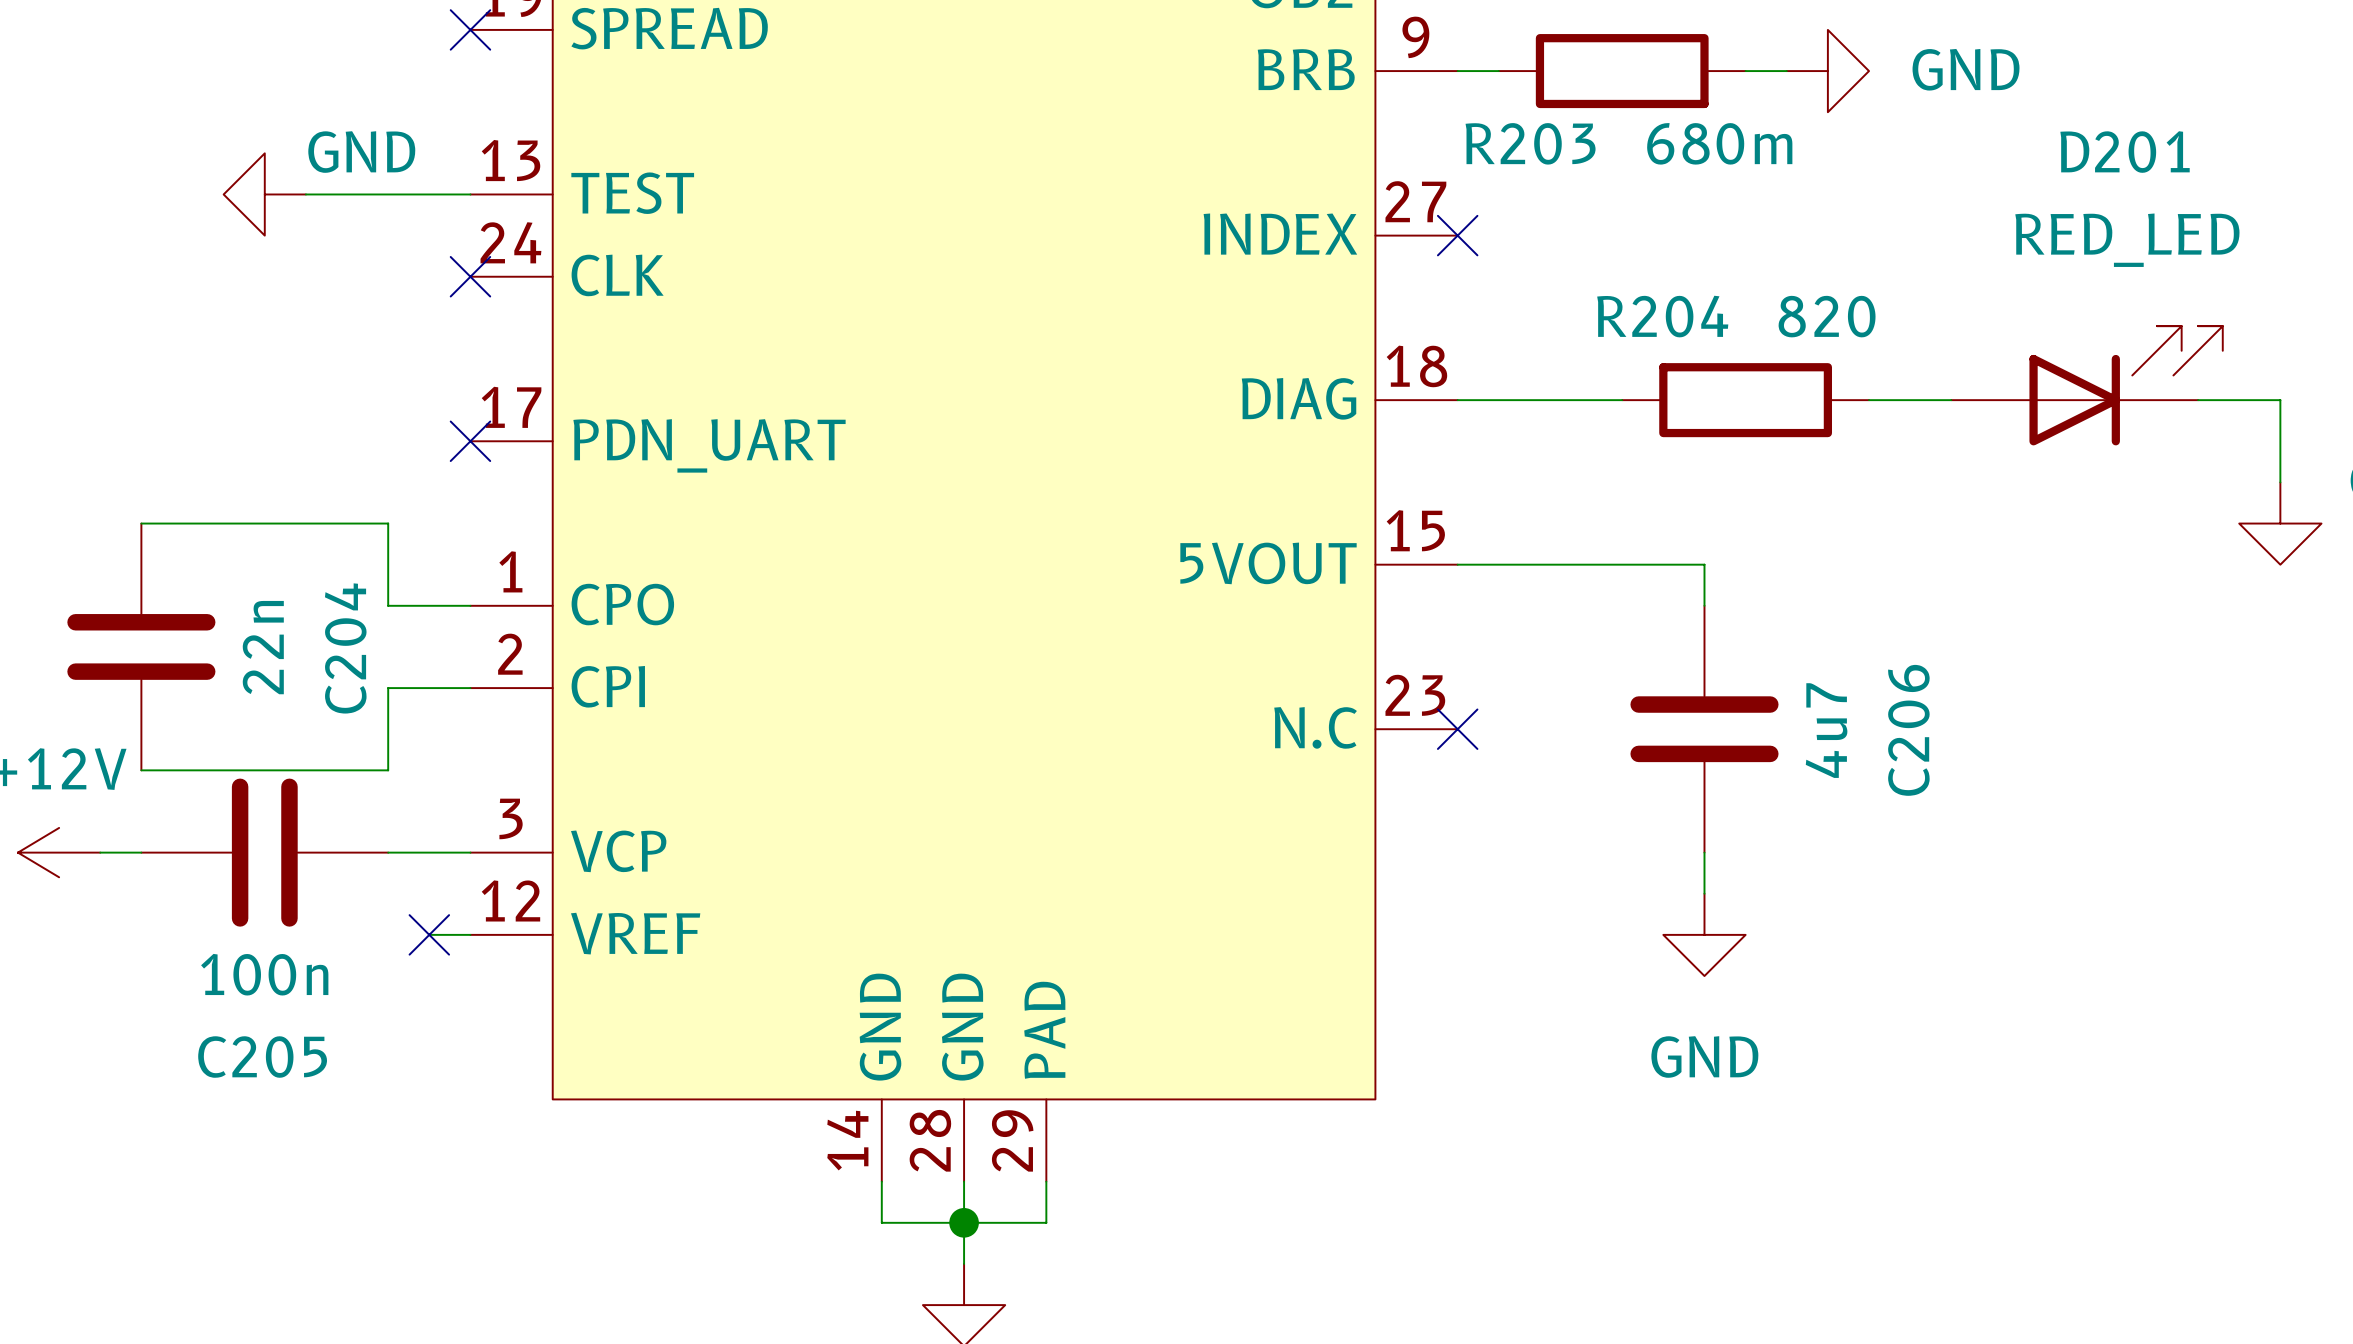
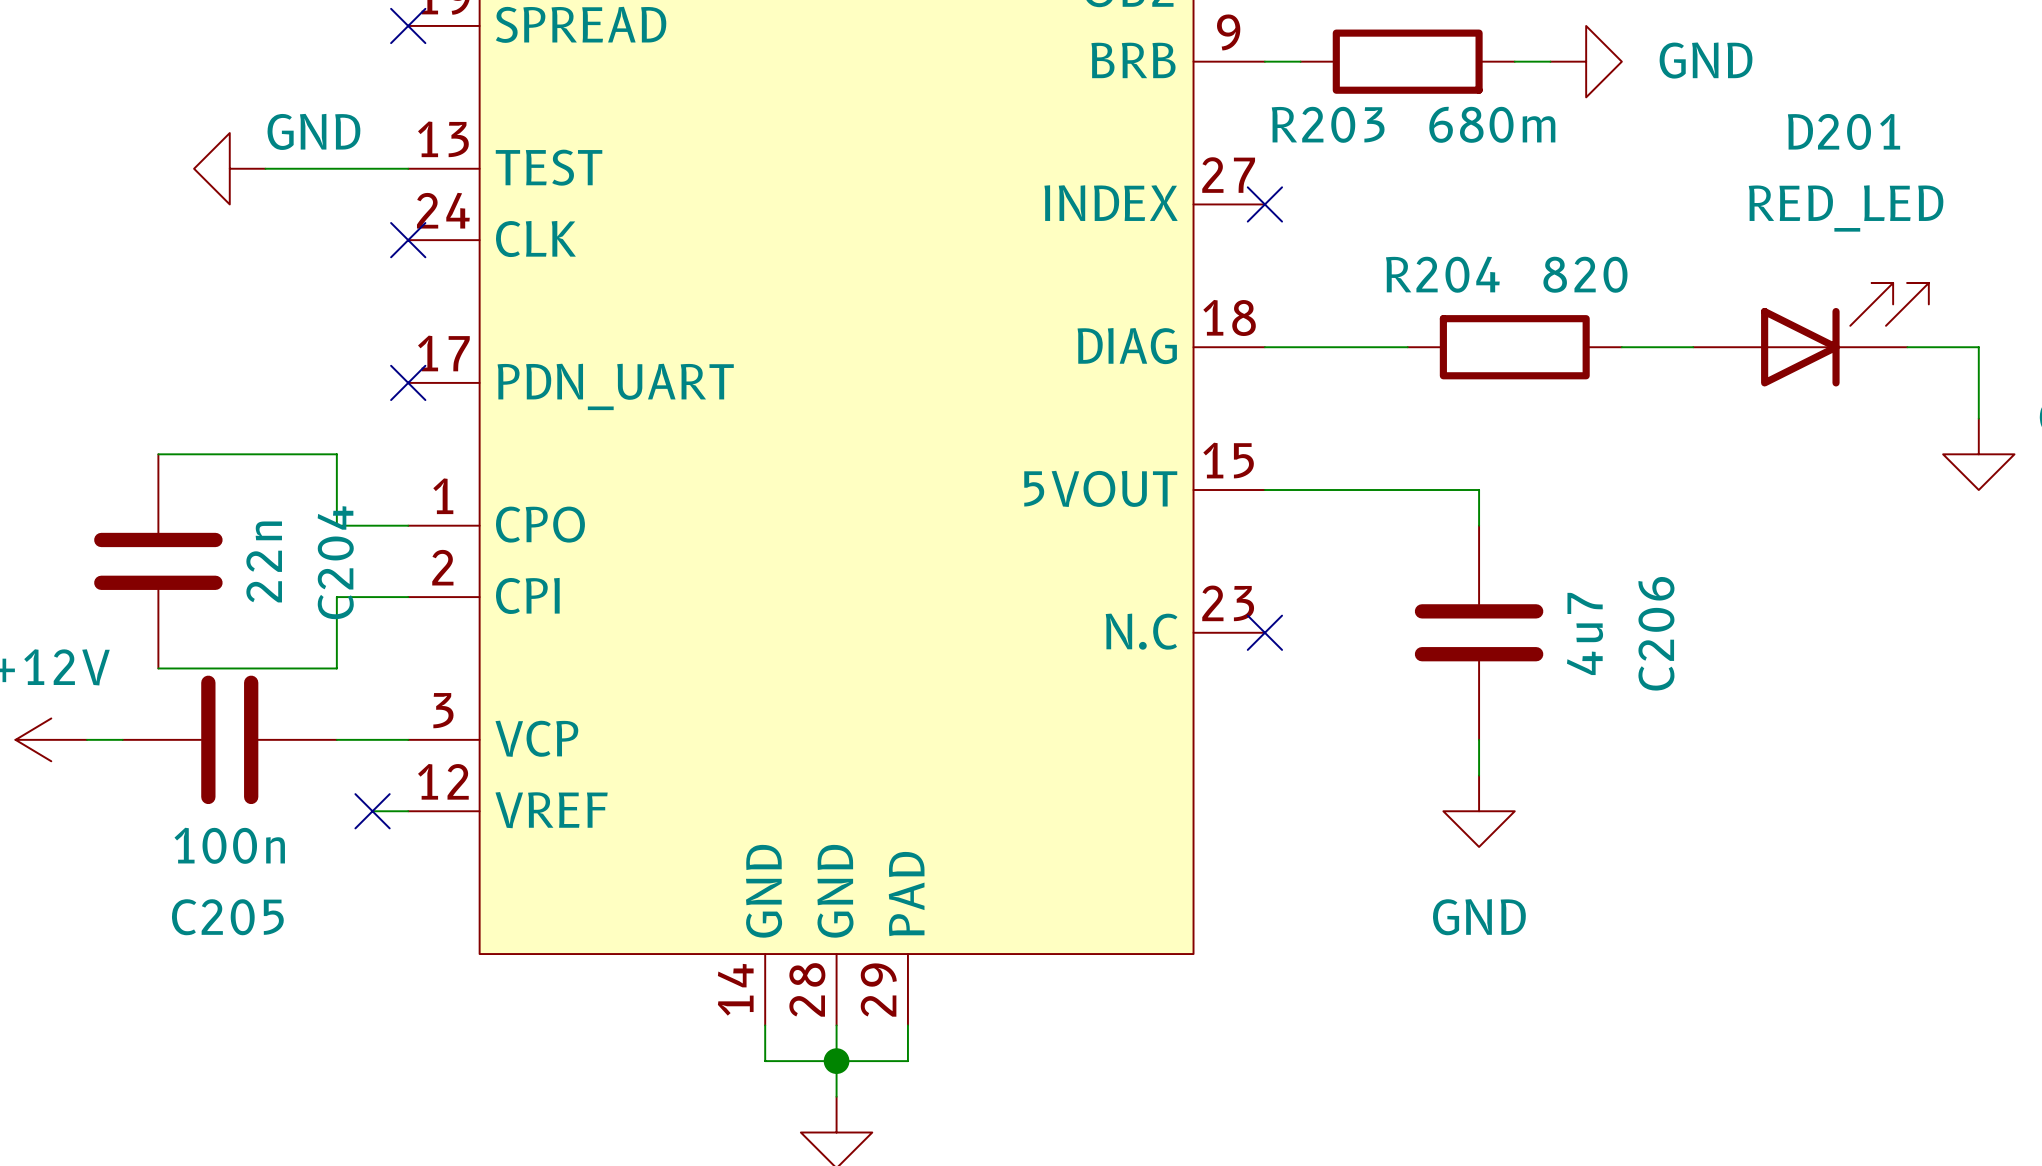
wire: (141, 523) (182, 523) -> none
C204 position: (141, 646) -> (158, 561)
wire: (141, 770) (182, 770) -> none

